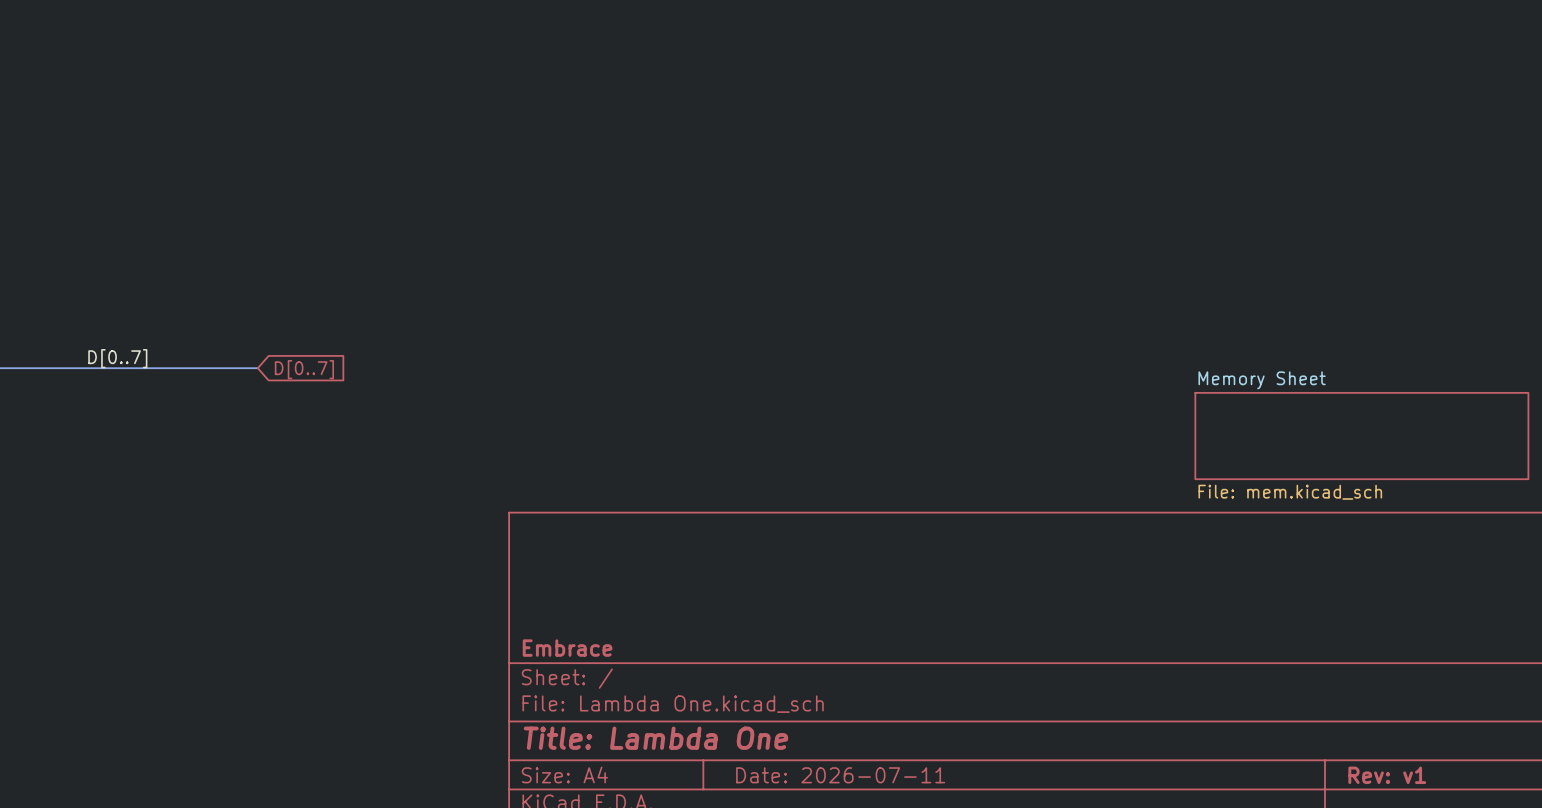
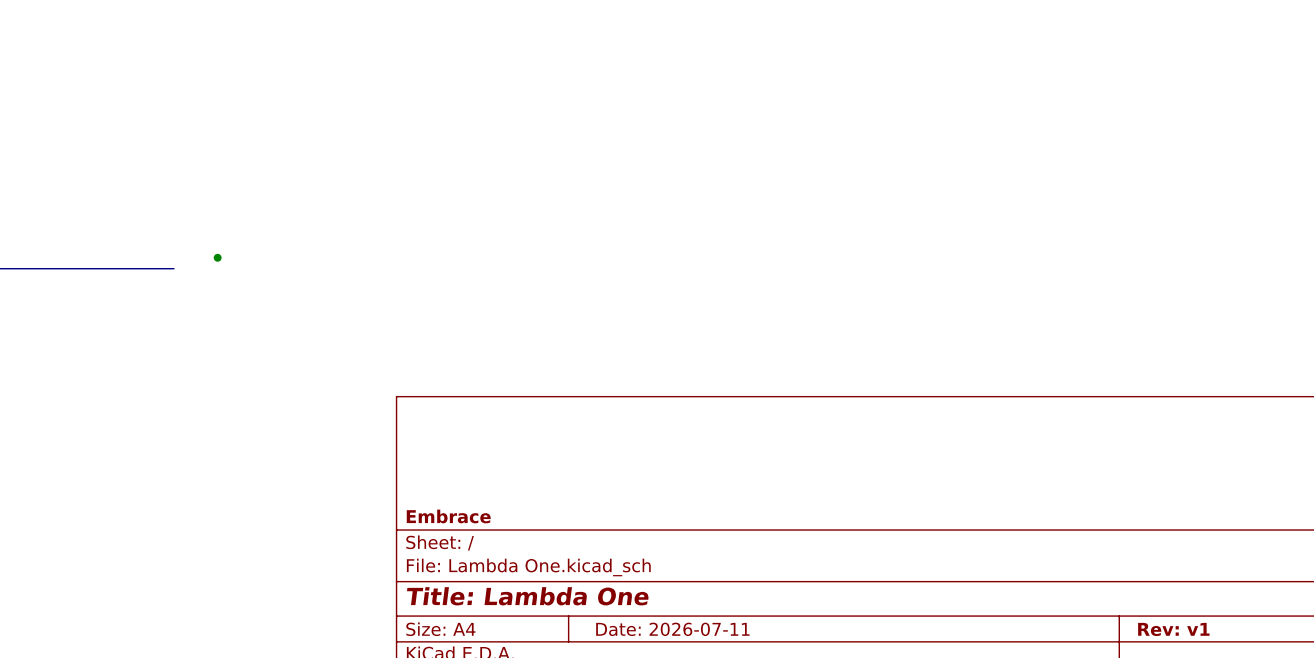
junction: none -> (217, 257)
label: D[0..7] (117, 358) -> none
global label: D[0..7] (304, 369) -> none
sheet Memory Sheet: File: mem.kicad_sch (1361, 436) -> none

